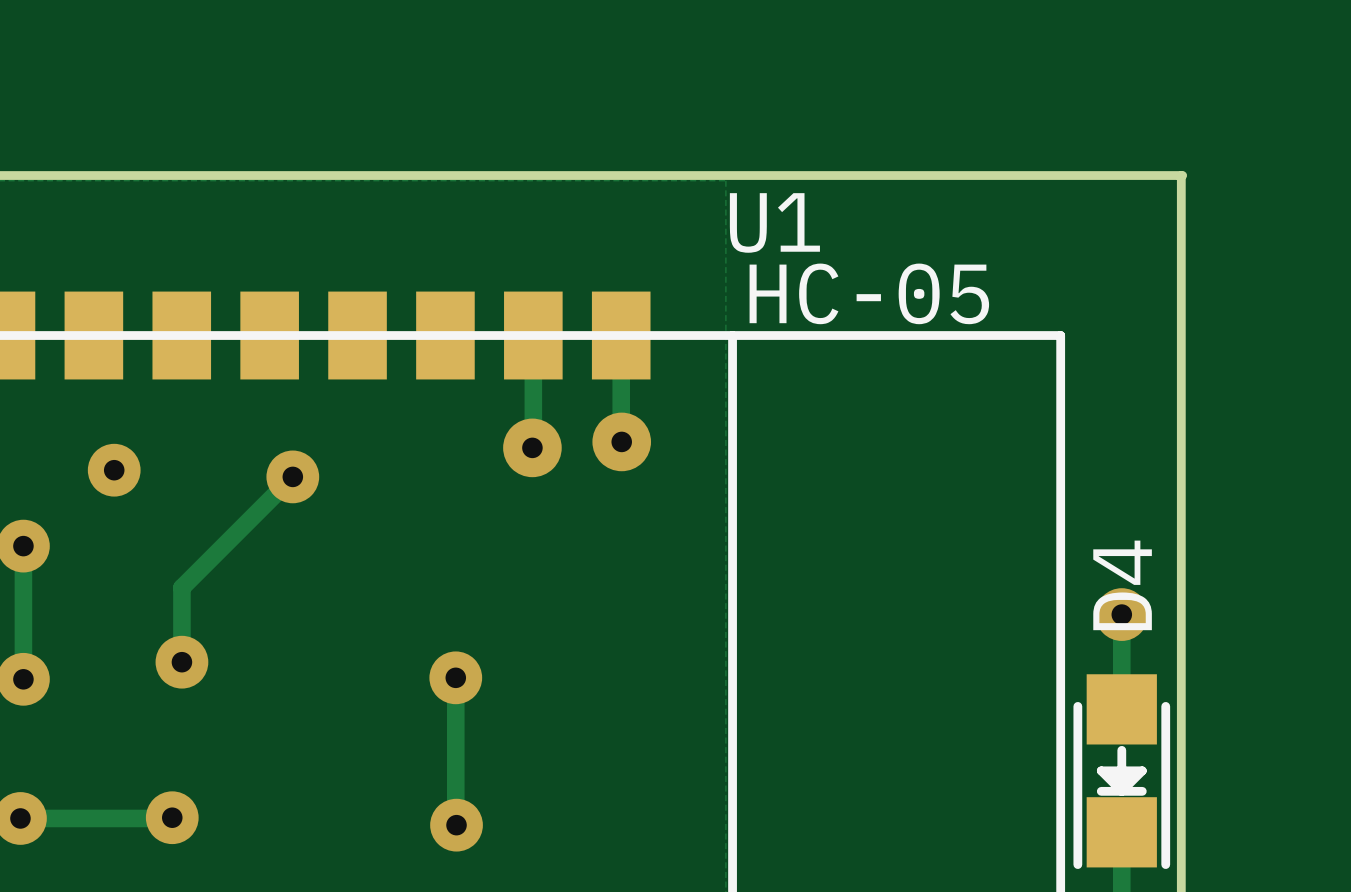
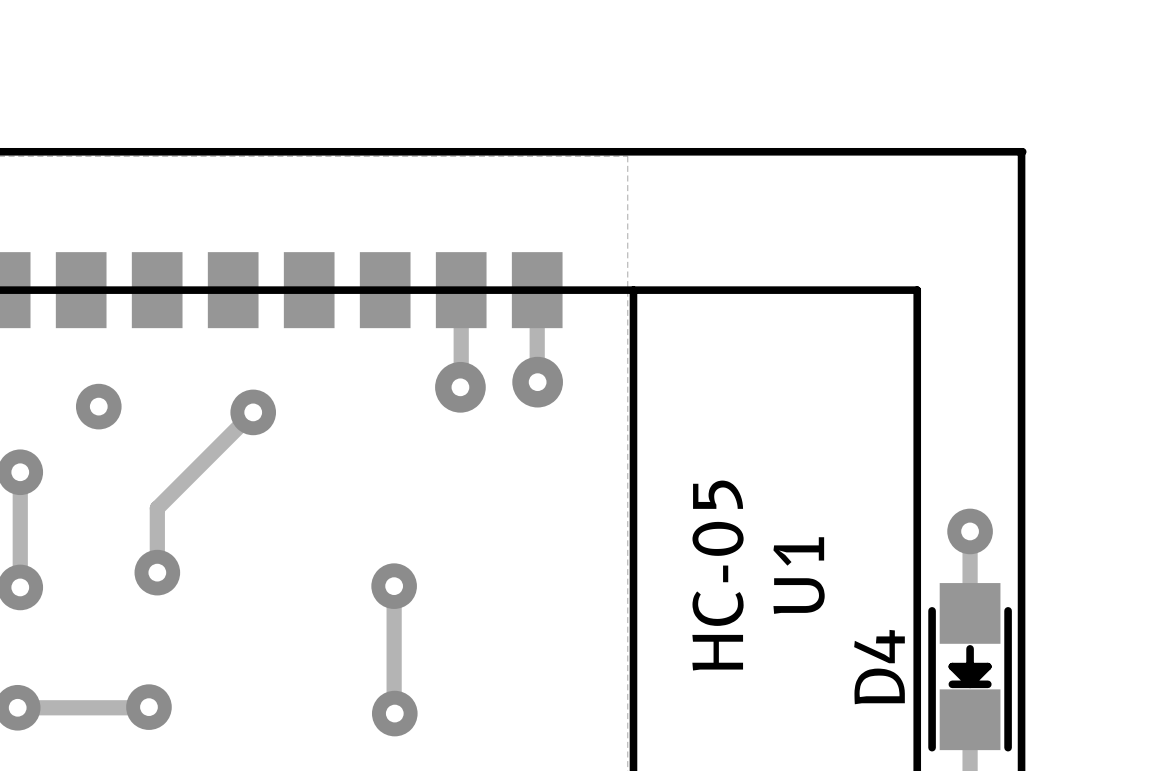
U1 name rotation: 0° (774, 222) -> 90° counterclockwise (799, 575)
U1 name position: U1 (774, 222) -> U1 (799, 575)
U1 value rotation: 0° (869, 293) -> 90° counterclockwise (718, 575)
U1 value position: HC-05 (869, 293) -> HC-05 (718, 575)
D4 name position: D4 (1122, 585) -> D4 (879, 667)

